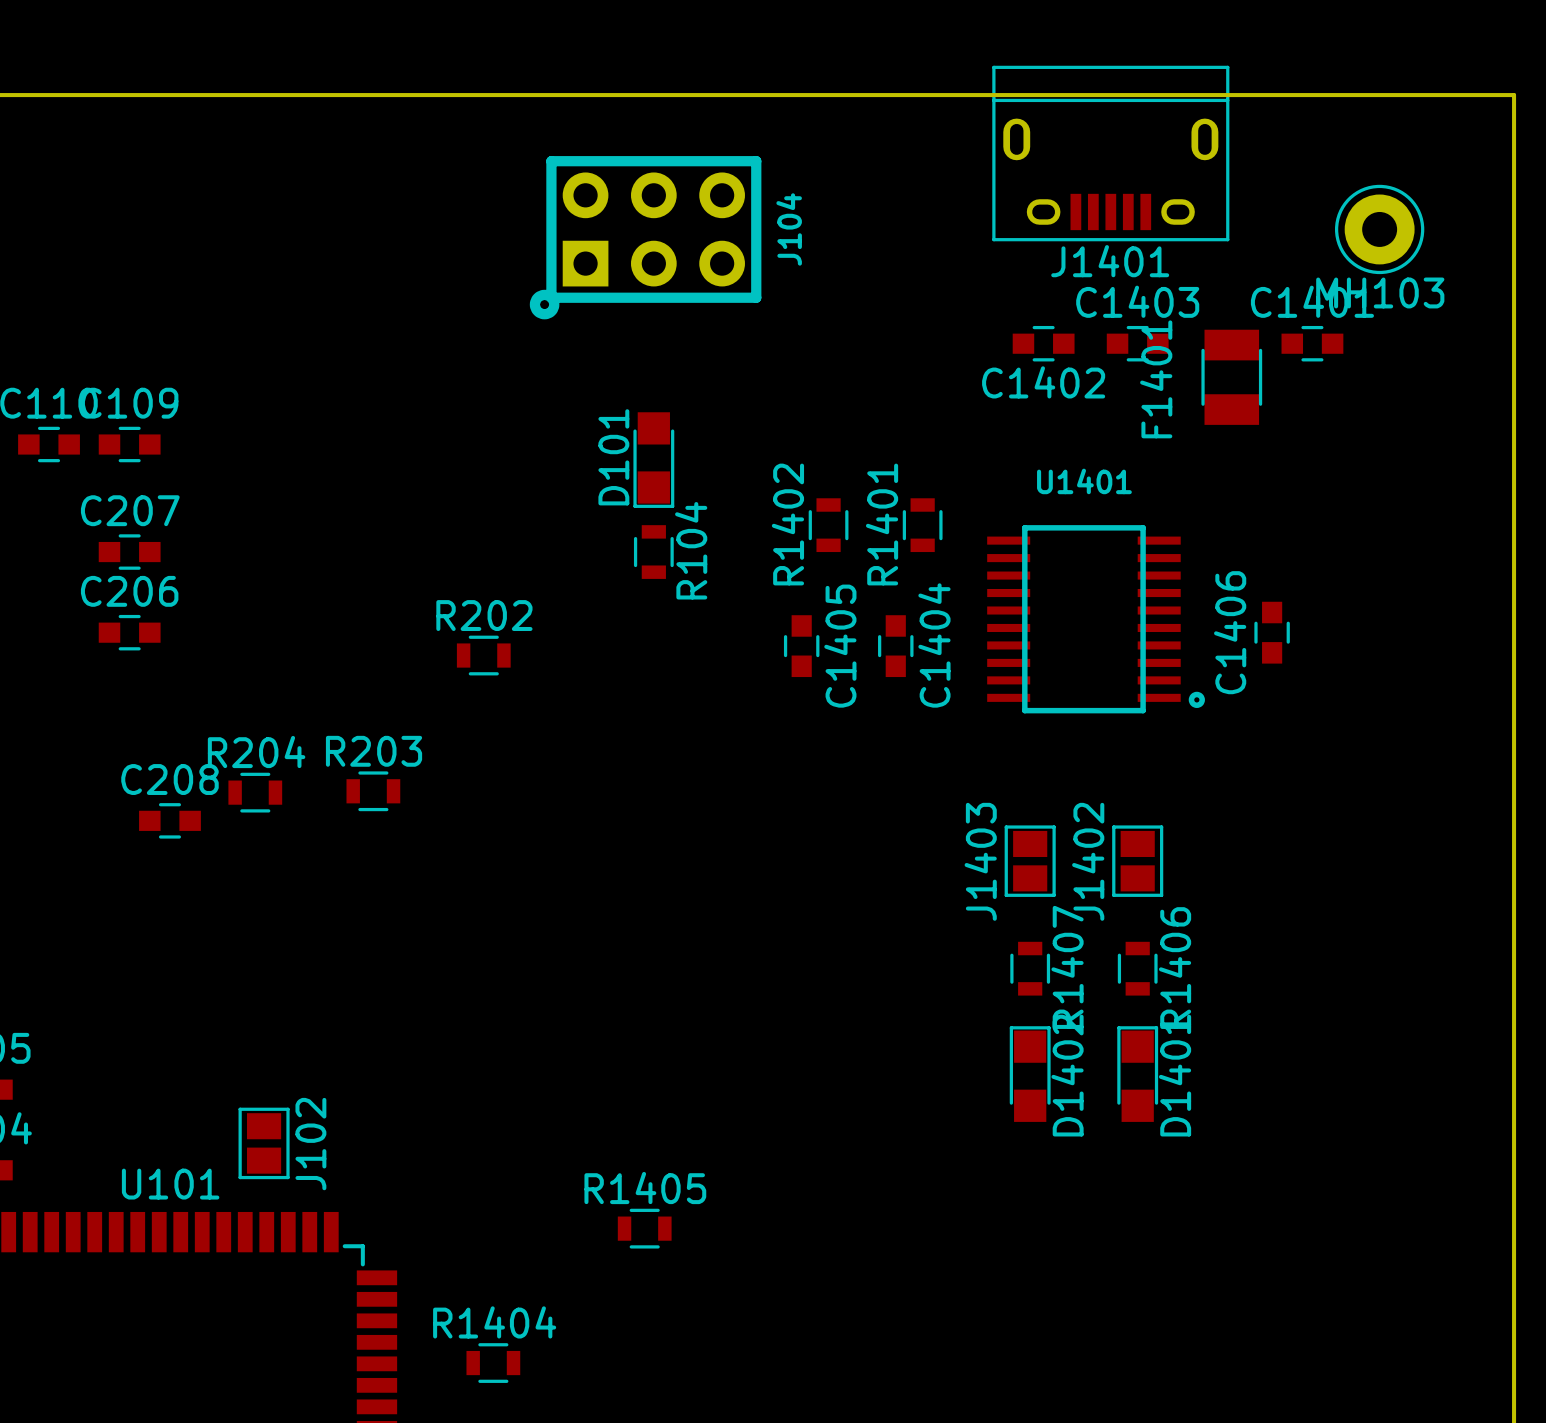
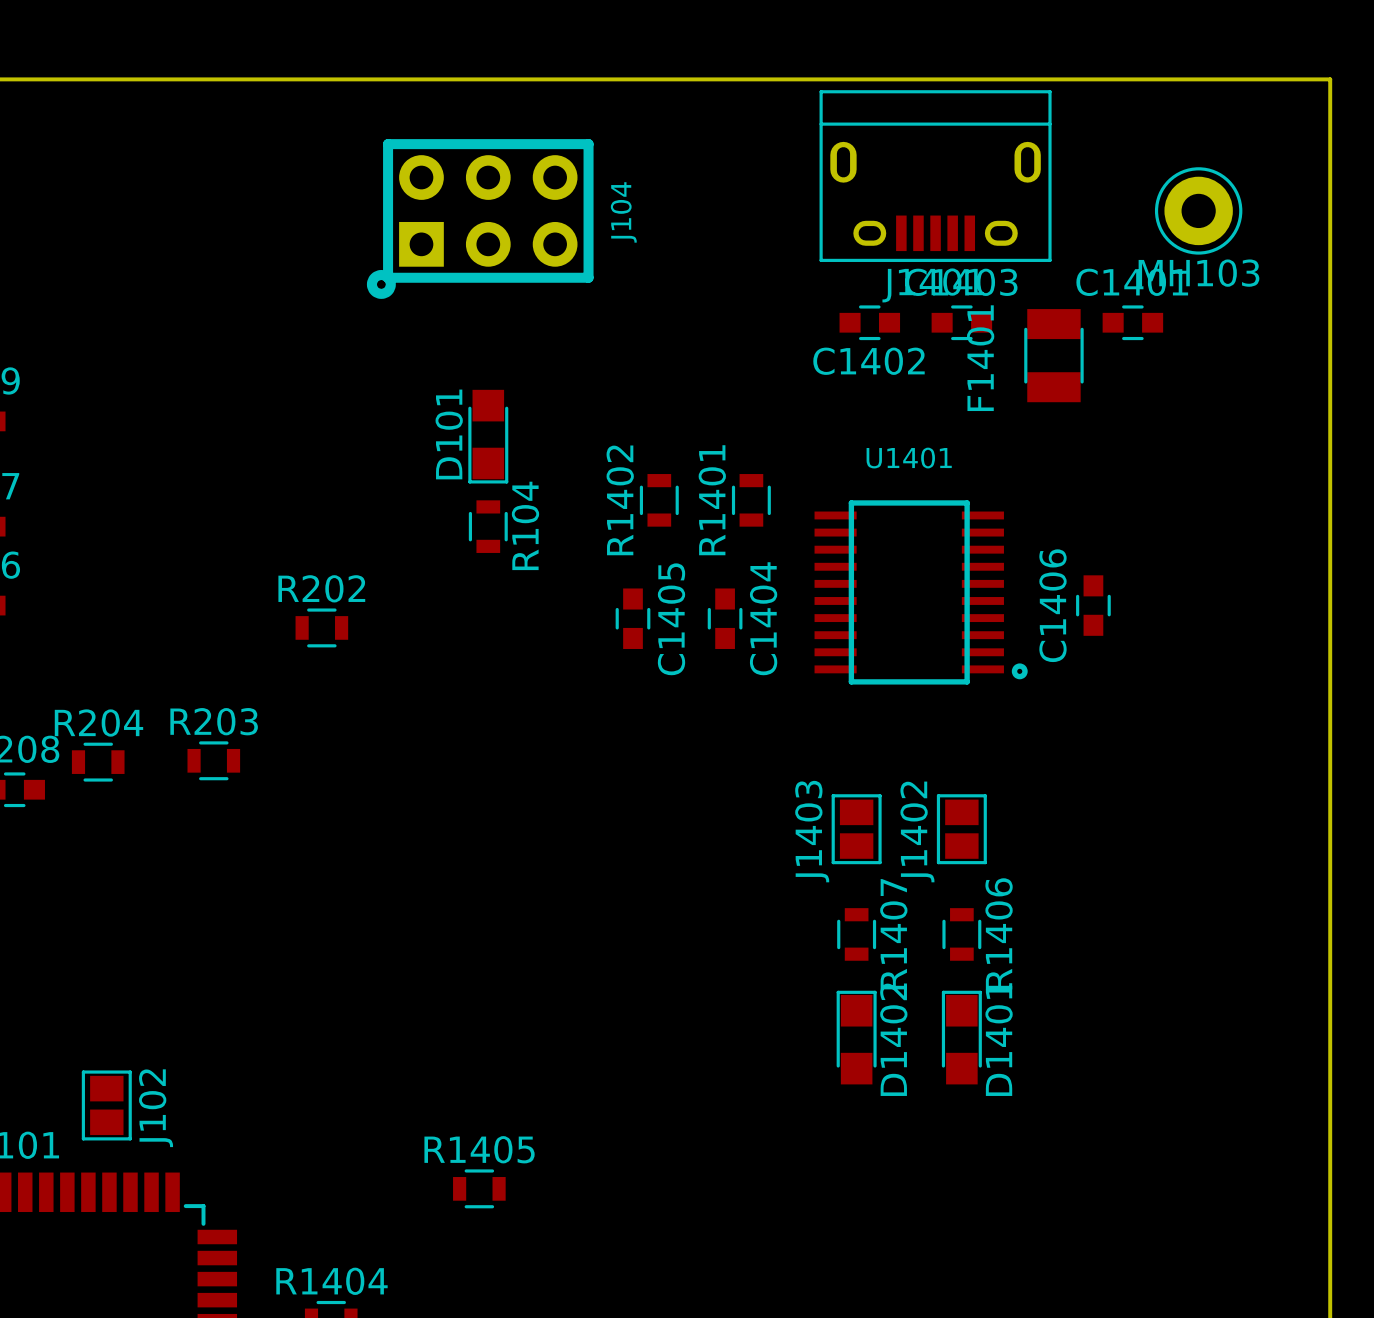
J1401 position: (1110, 153) -> (935, 176)

